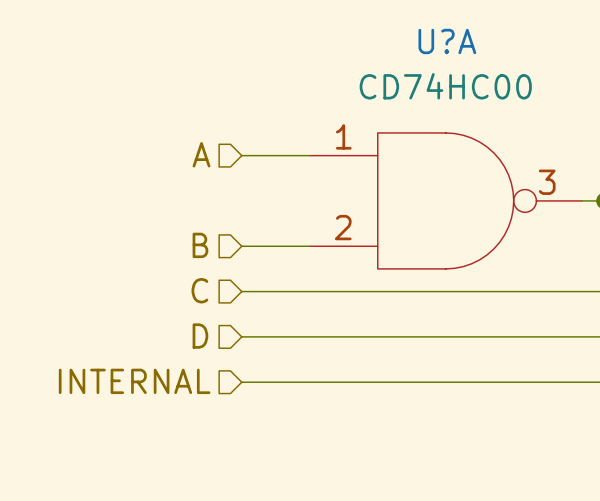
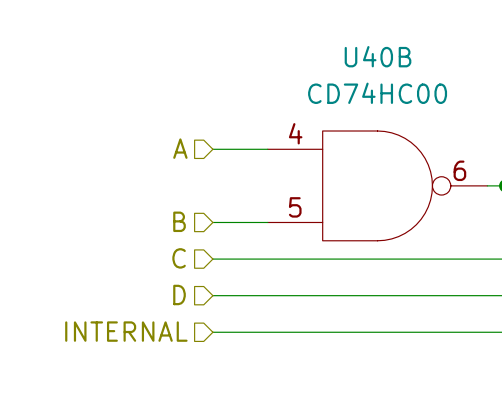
U?A name: U?A (447, 41) -> U40B (378, 56)
U?A pin number: 1 (343, 136) -> 4 (295, 133)
U?A pin number: 3 (547, 182) -> 6 (459, 170)
U?A pin number: 2 (343, 227) -> 5 (295, 207)

